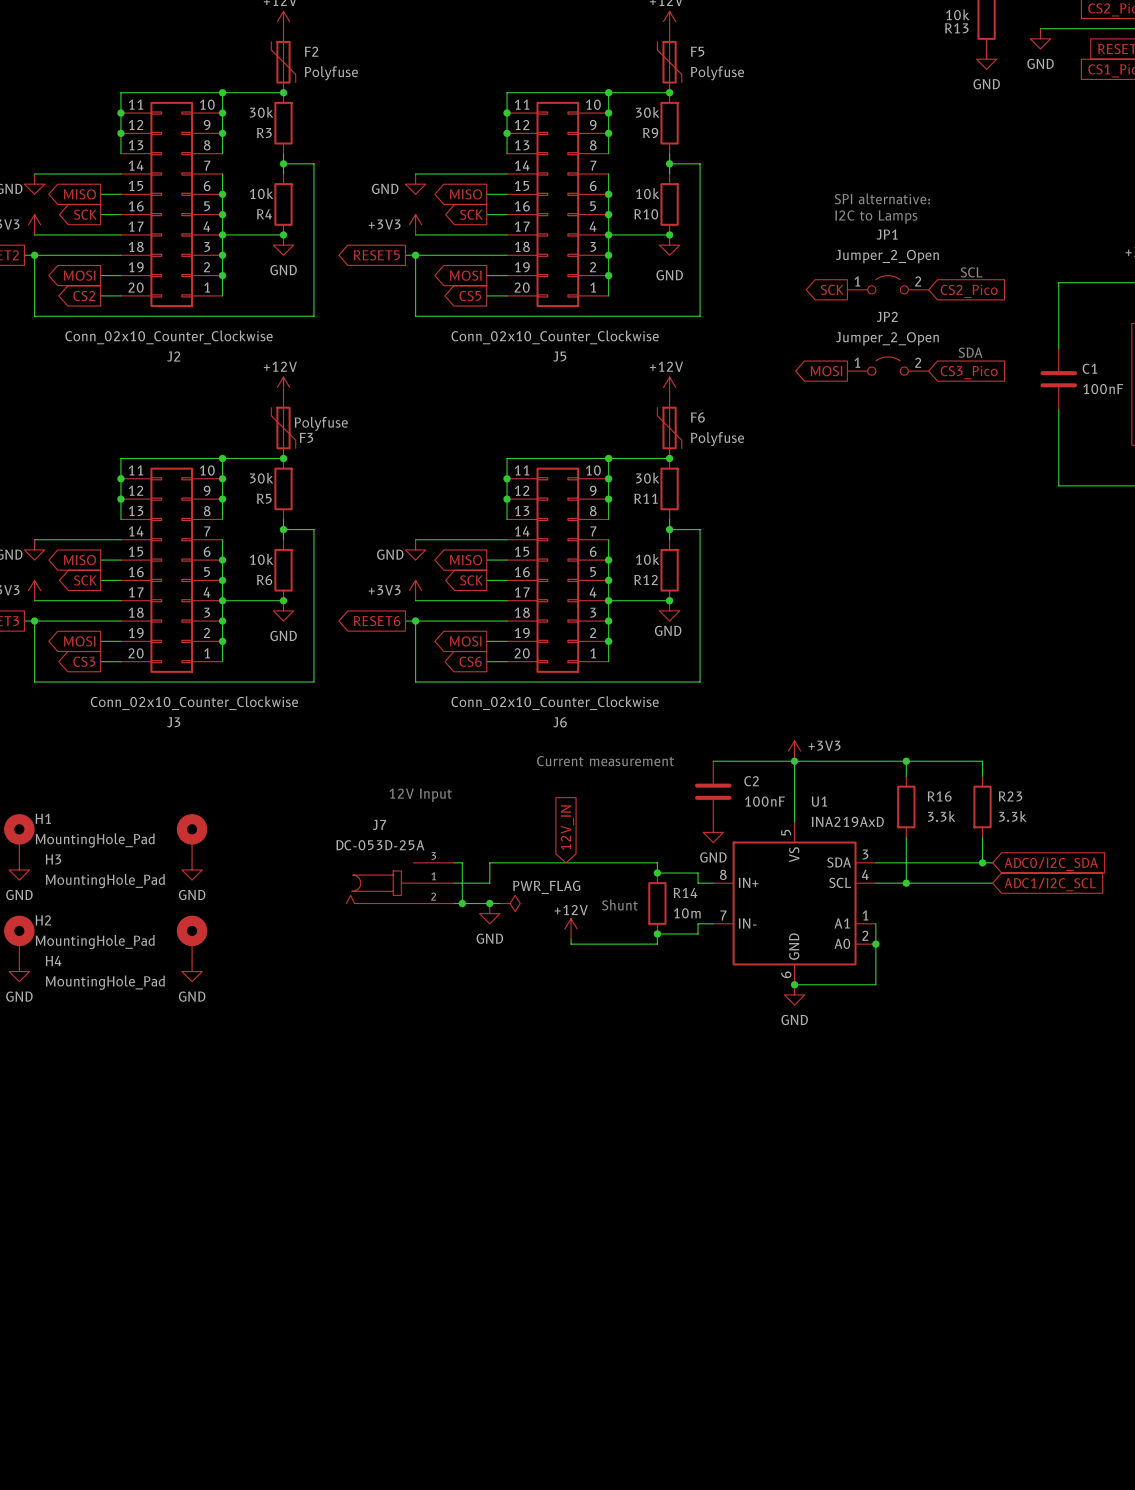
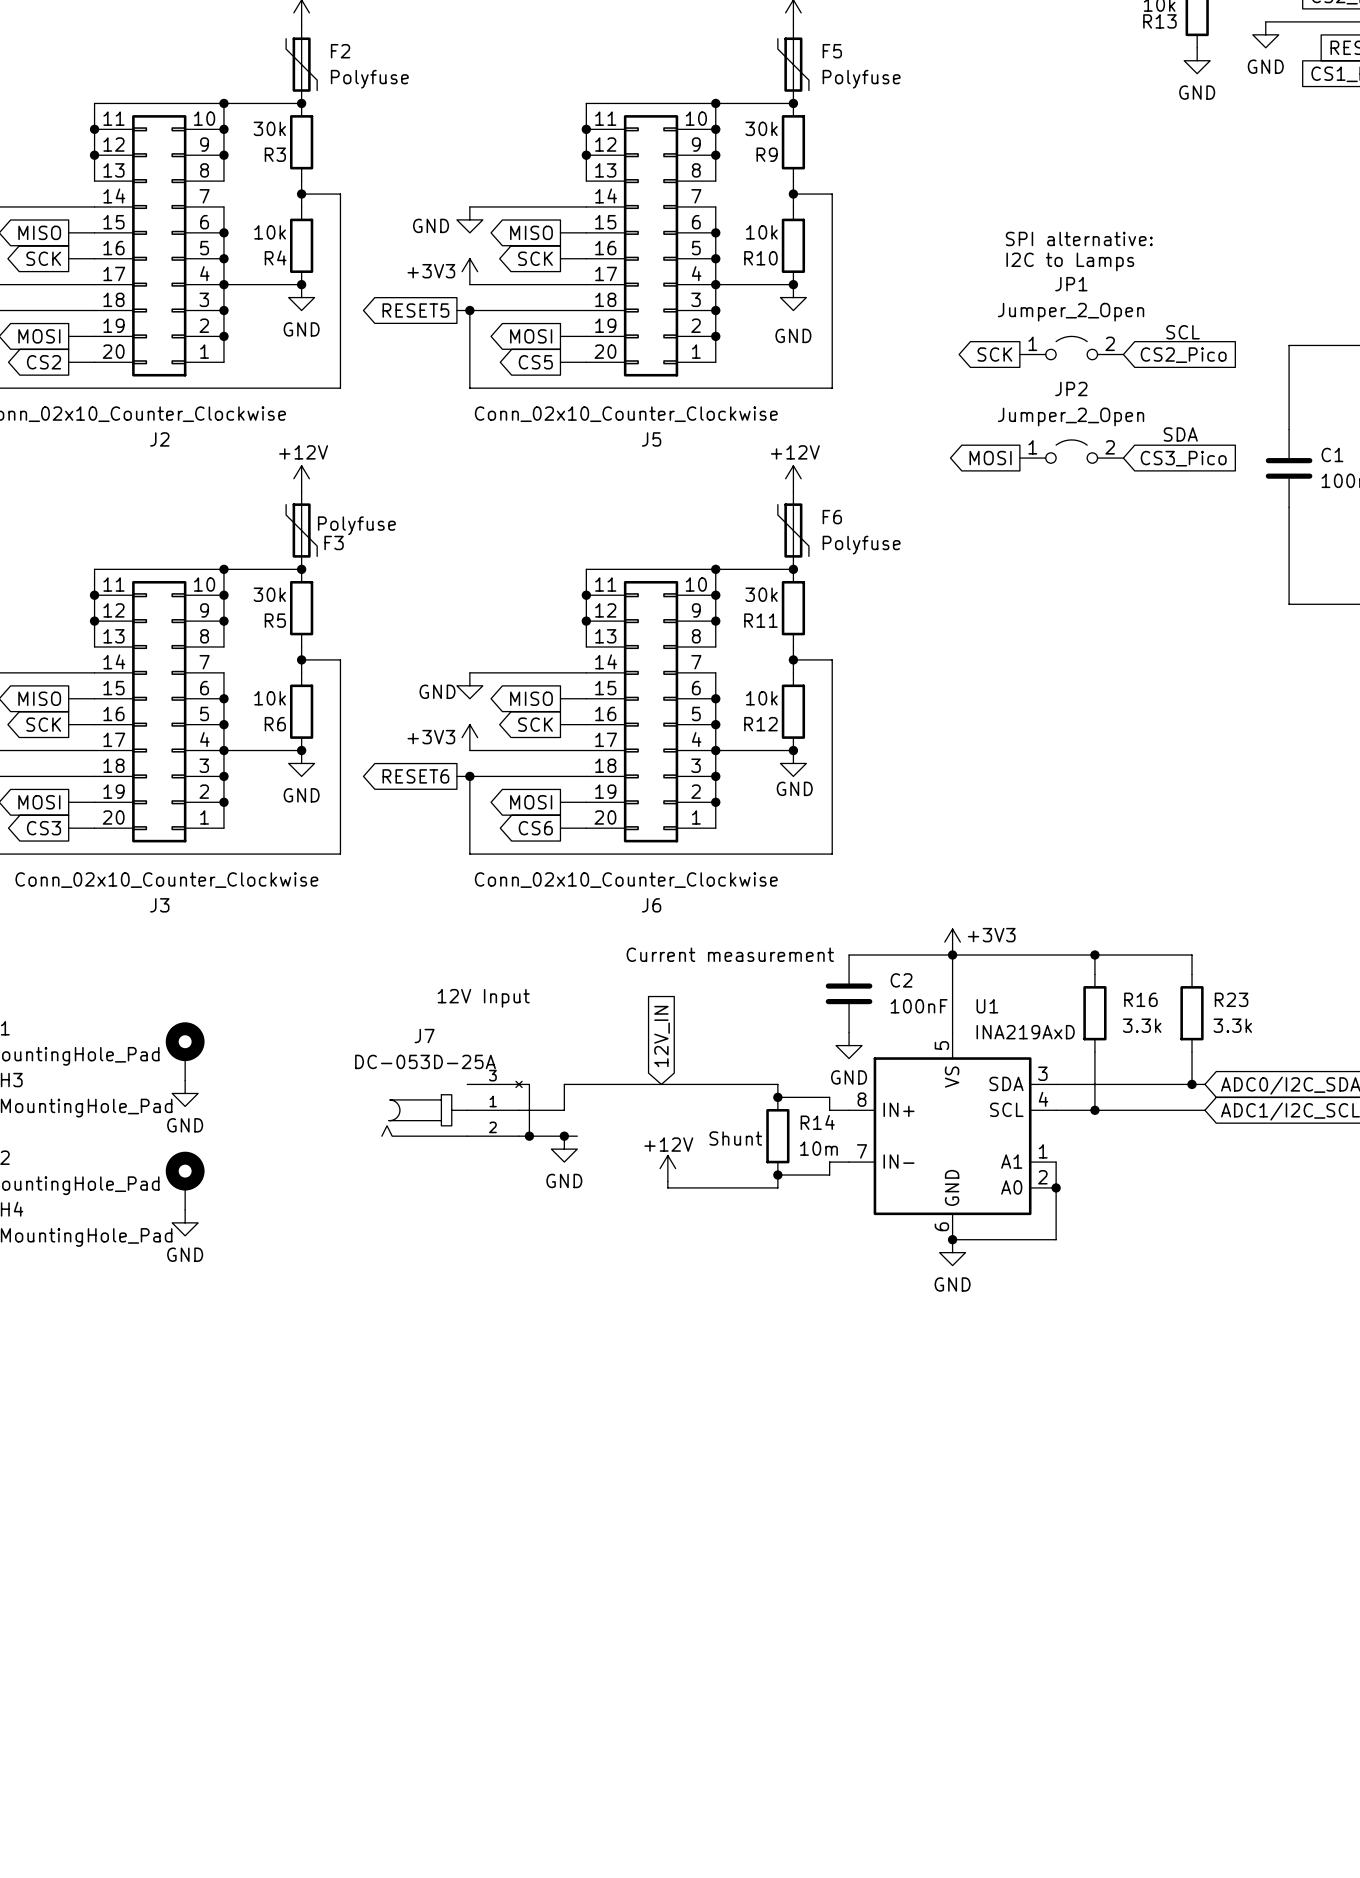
J7 symbol: [346, 862, 455, 904] -> [381, 1081, 523, 1137]
power symbol: PWR_FLAG (510, 903) -> none

